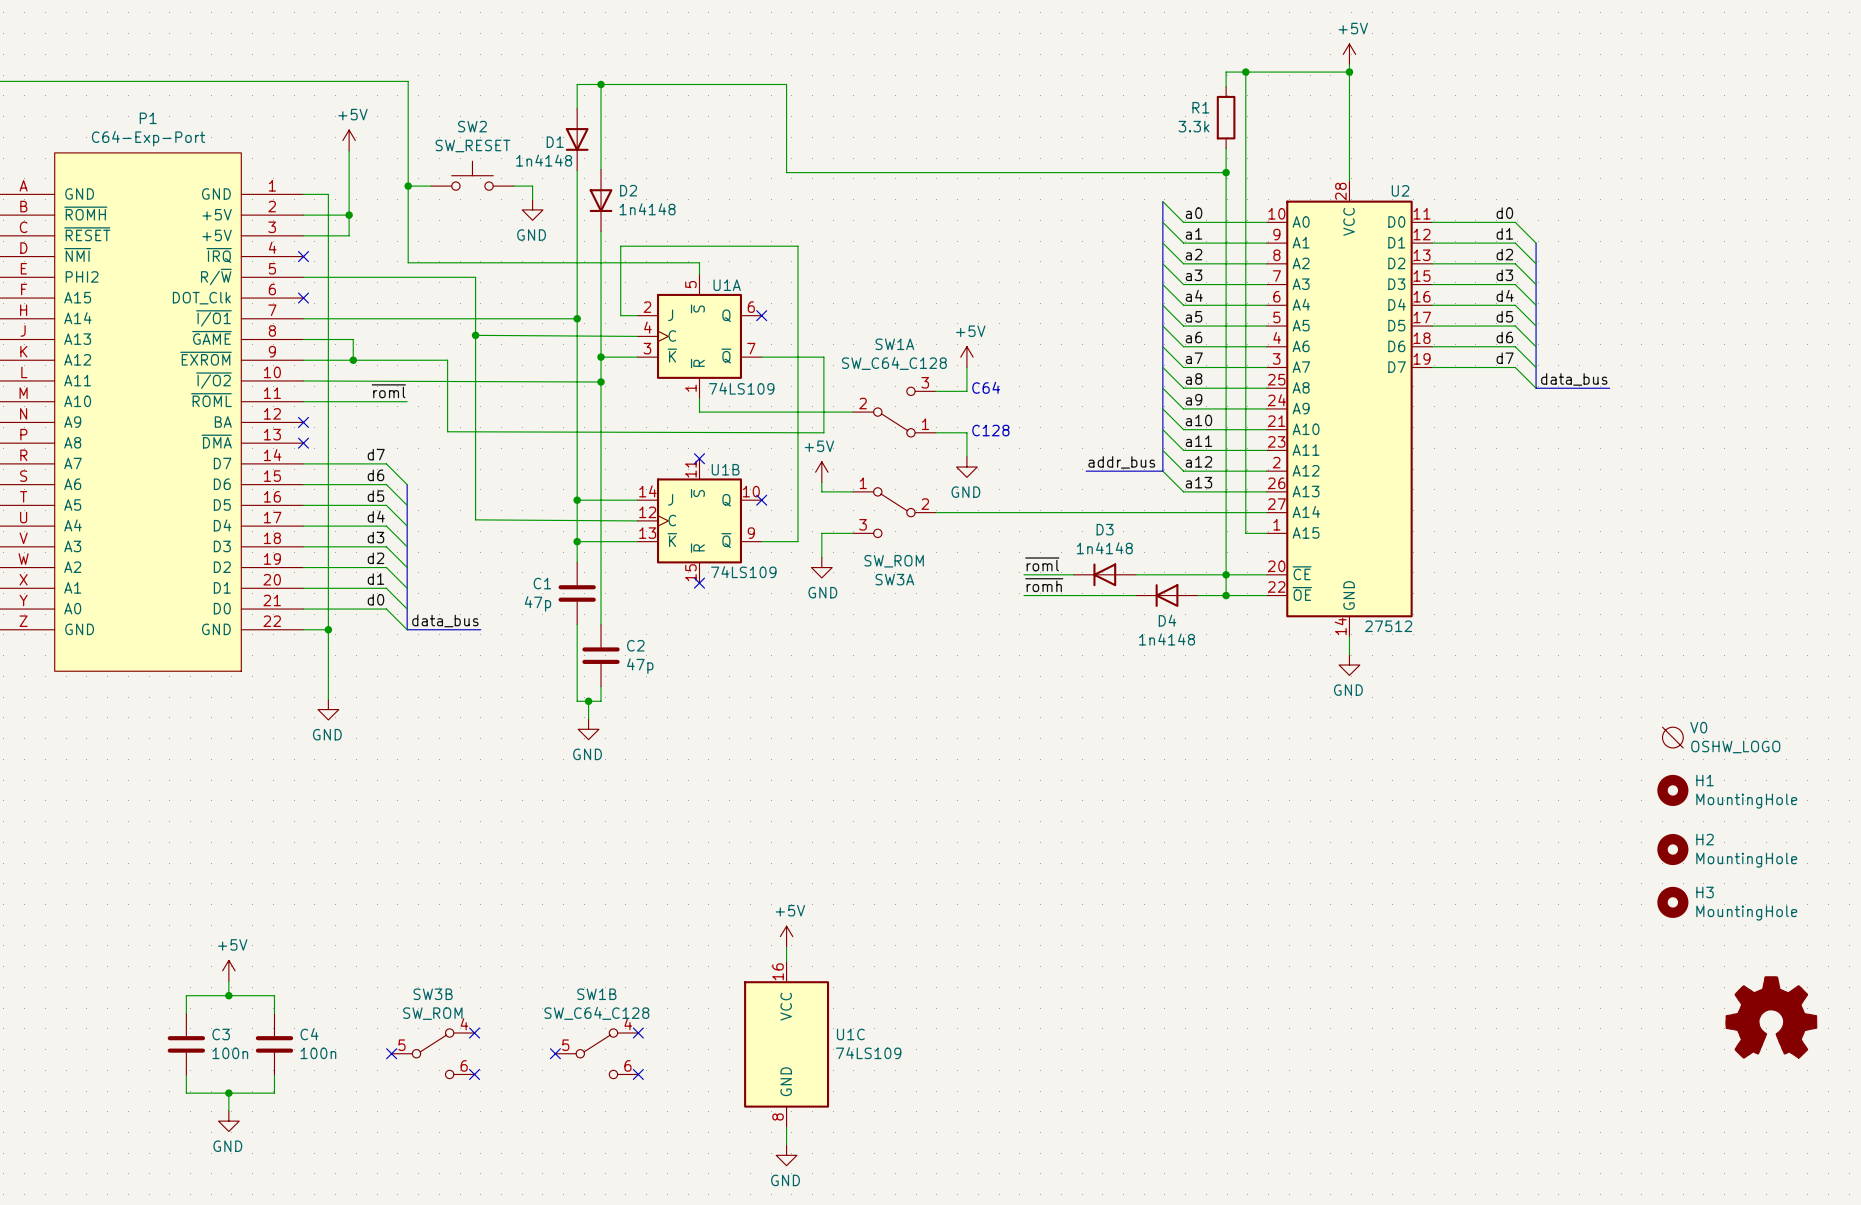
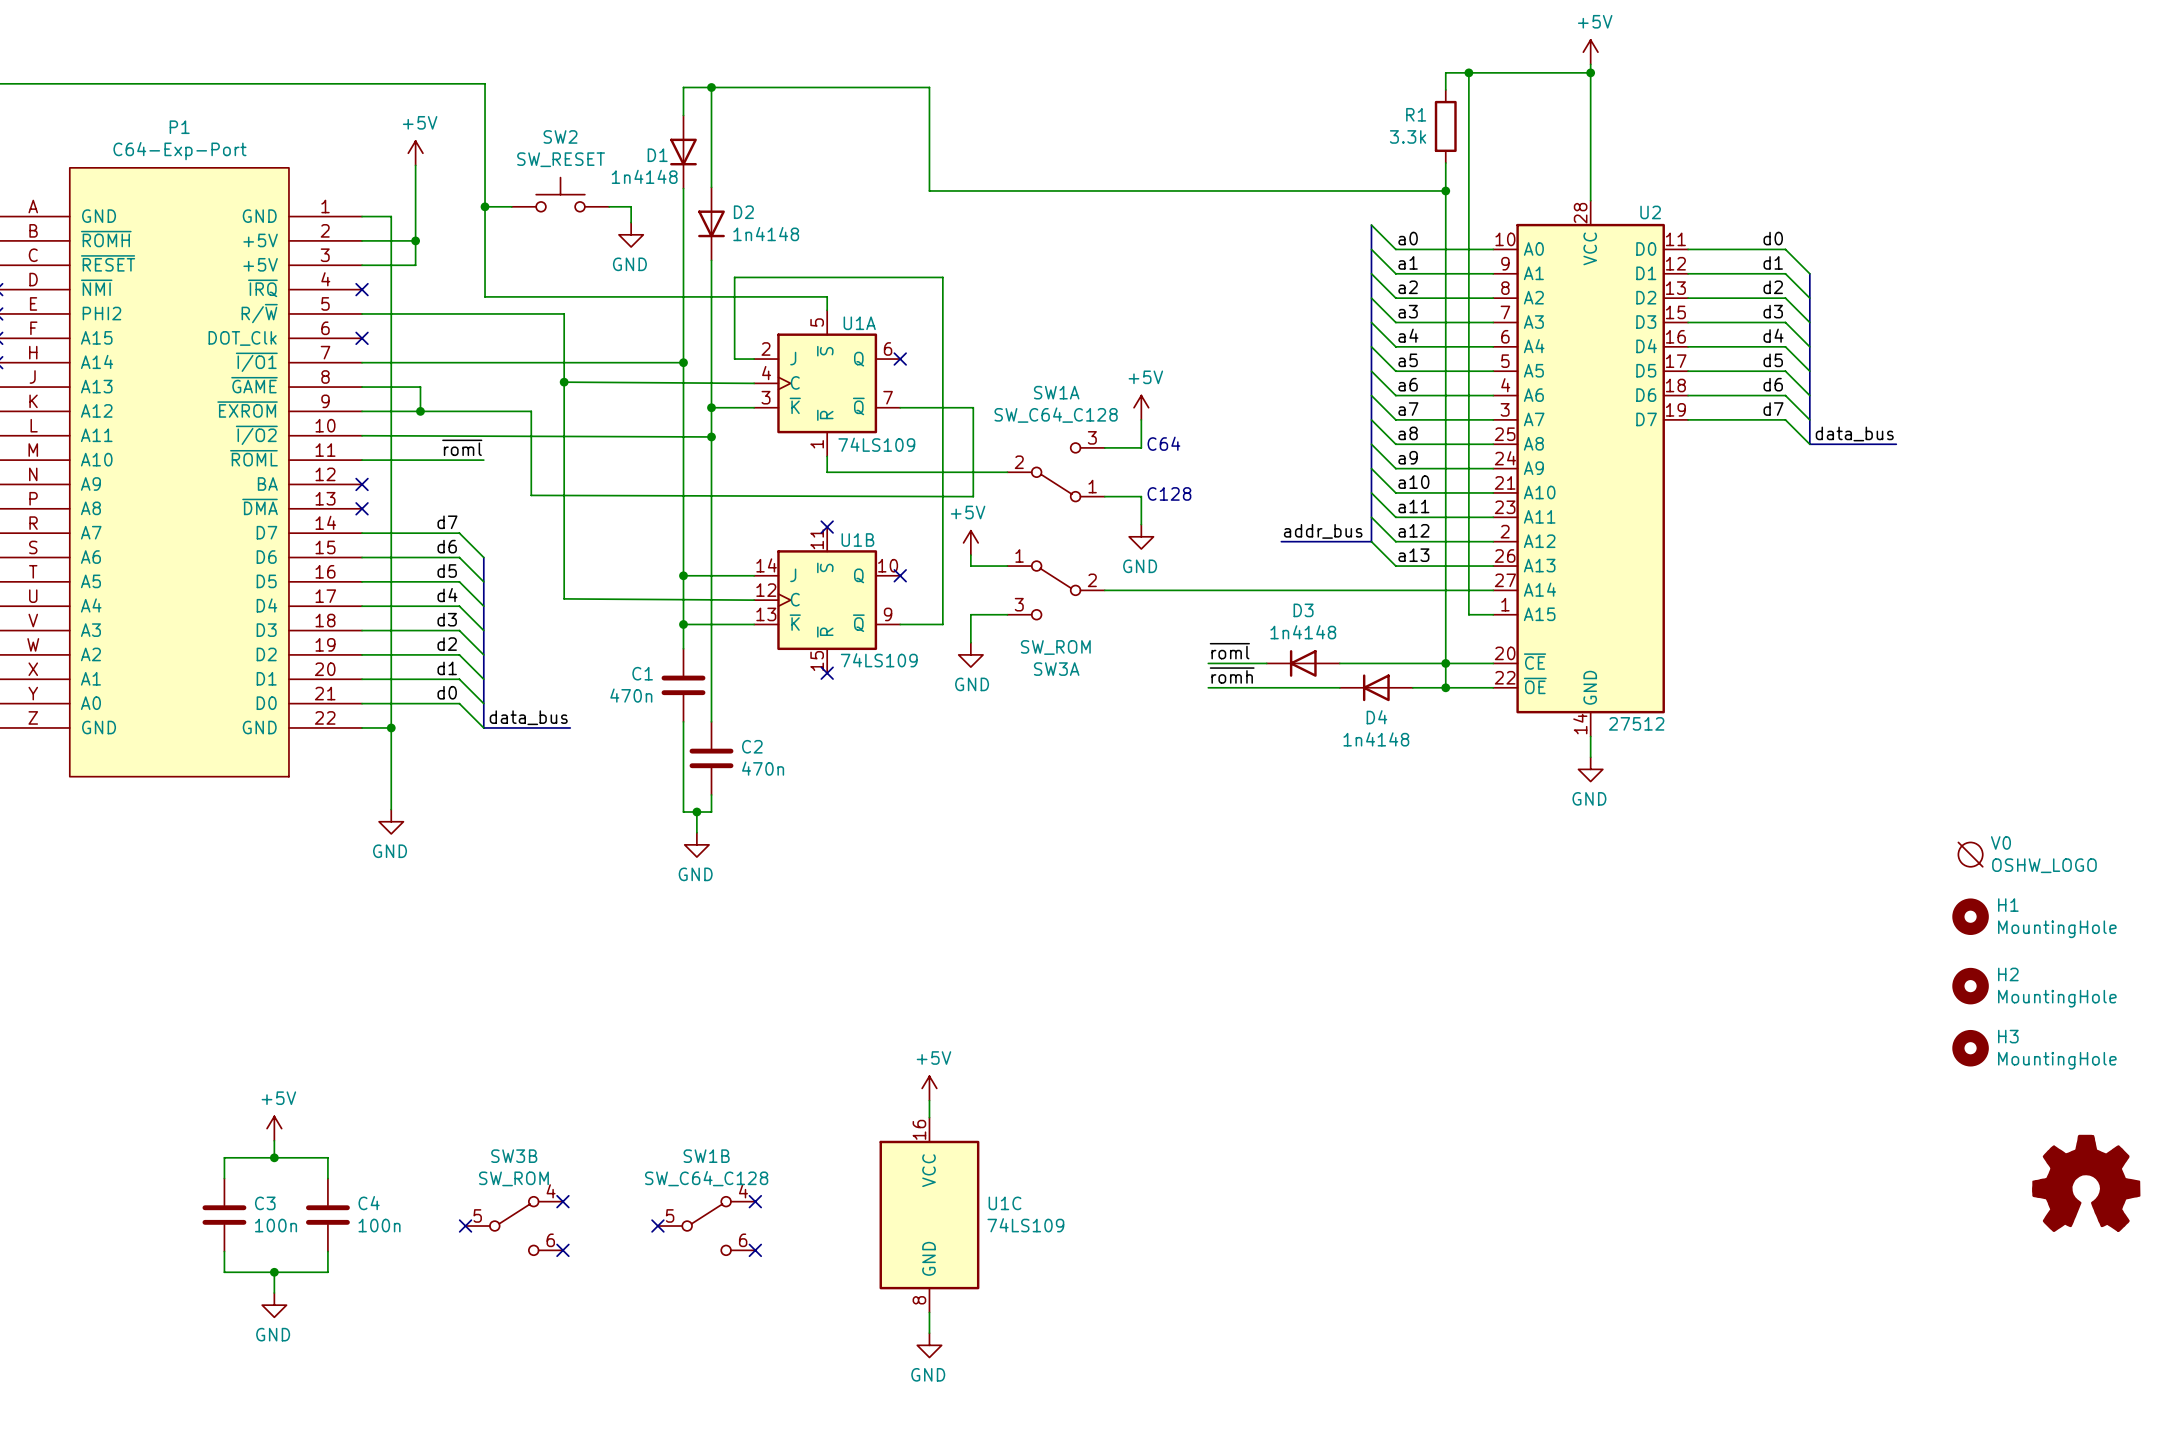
C1 value: 47p (537, 603) -> 470n (631, 695)
C2 value: 47p (640, 666) -> 470n (763, 768)

